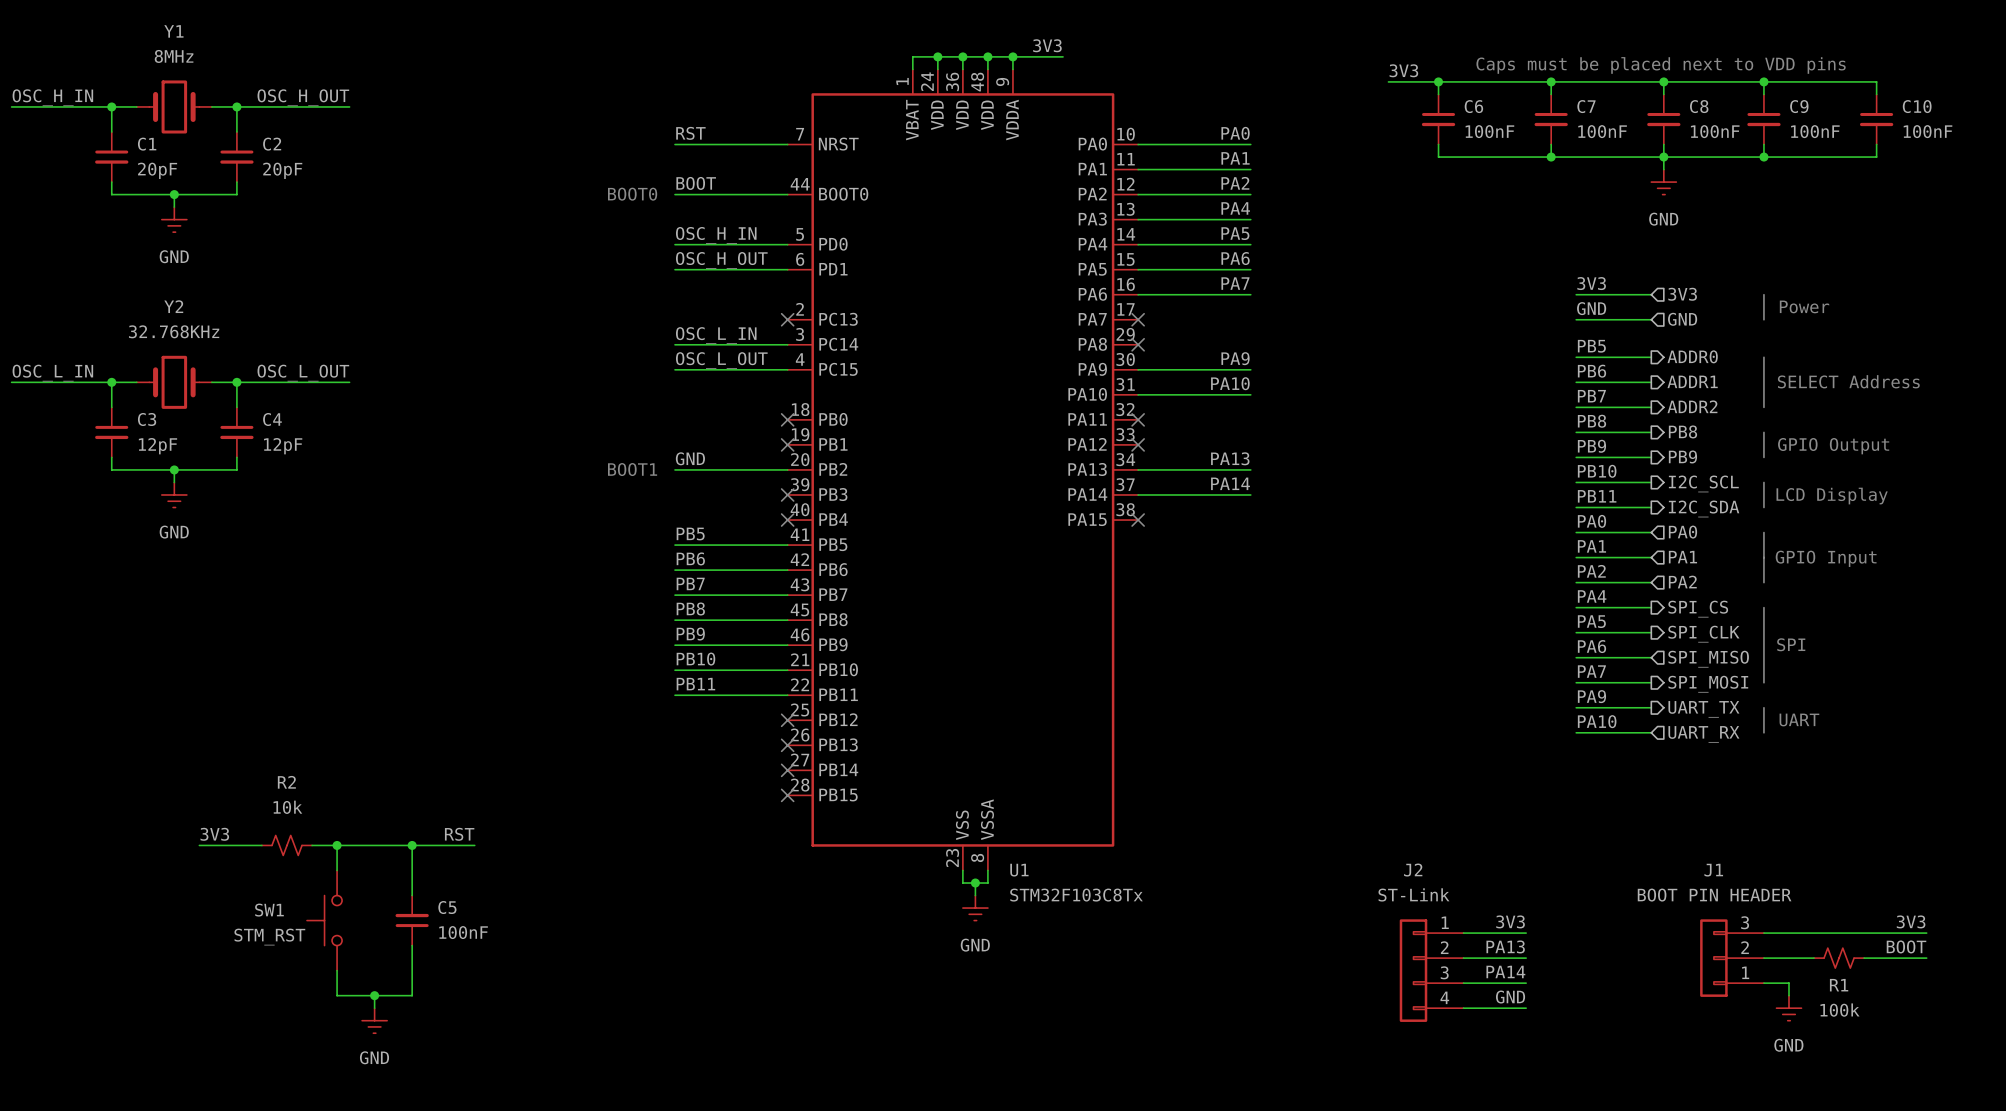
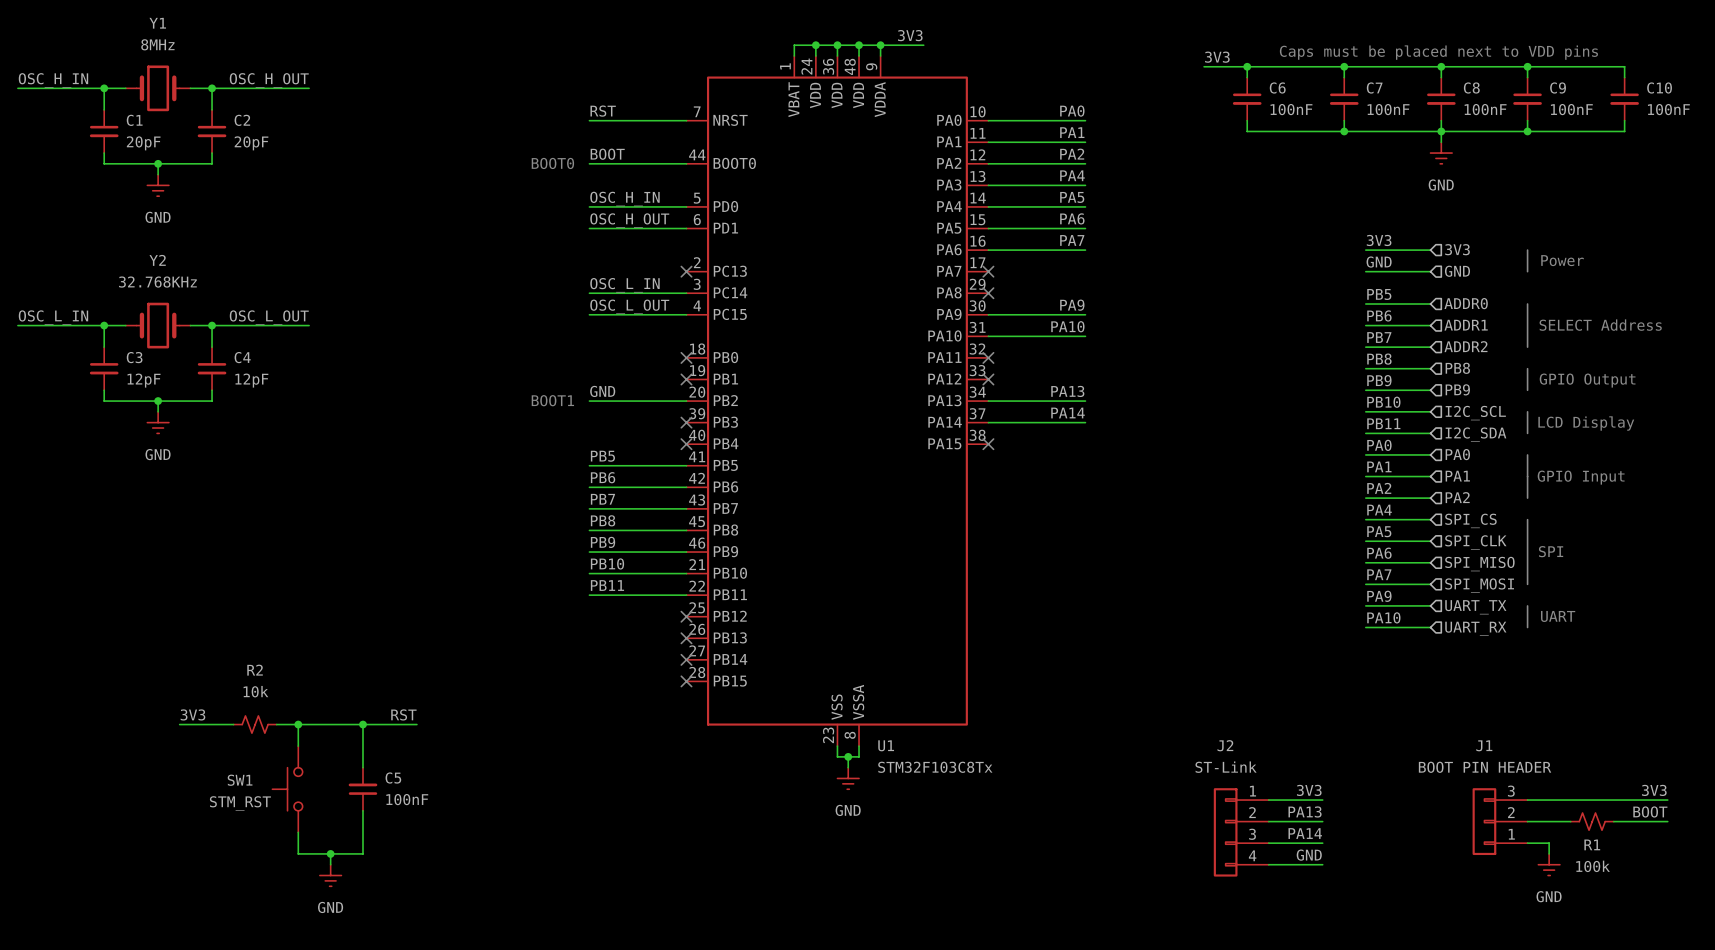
hierarchical label shape: output (1692, 356) -> input (1466, 303)
hierarchical label shape: output (1692, 381) -> input (1466, 325)
hierarchical label shape: output (1692, 406) -> input (1465, 346)
hierarchical label shape: output (1682, 431) -> input (1457, 368)
hierarchical label shape: output (1682, 456) -> input (1457, 389)
hierarchical label shape: output (1703, 483) -> input (1475, 413)
hierarchical label shape: output (1704, 508) -> input (1475, 434)
hierarchical label shape: output (1698, 609) -> input (1470, 520)
hierarchical label shape: output (1703, 634) -> input (1475, 542)
hierarchical label shape: output (1708, 684) -> input (1479, 585)
hierarchical label shape: output (1703, 709) -> input (1475, 607)

